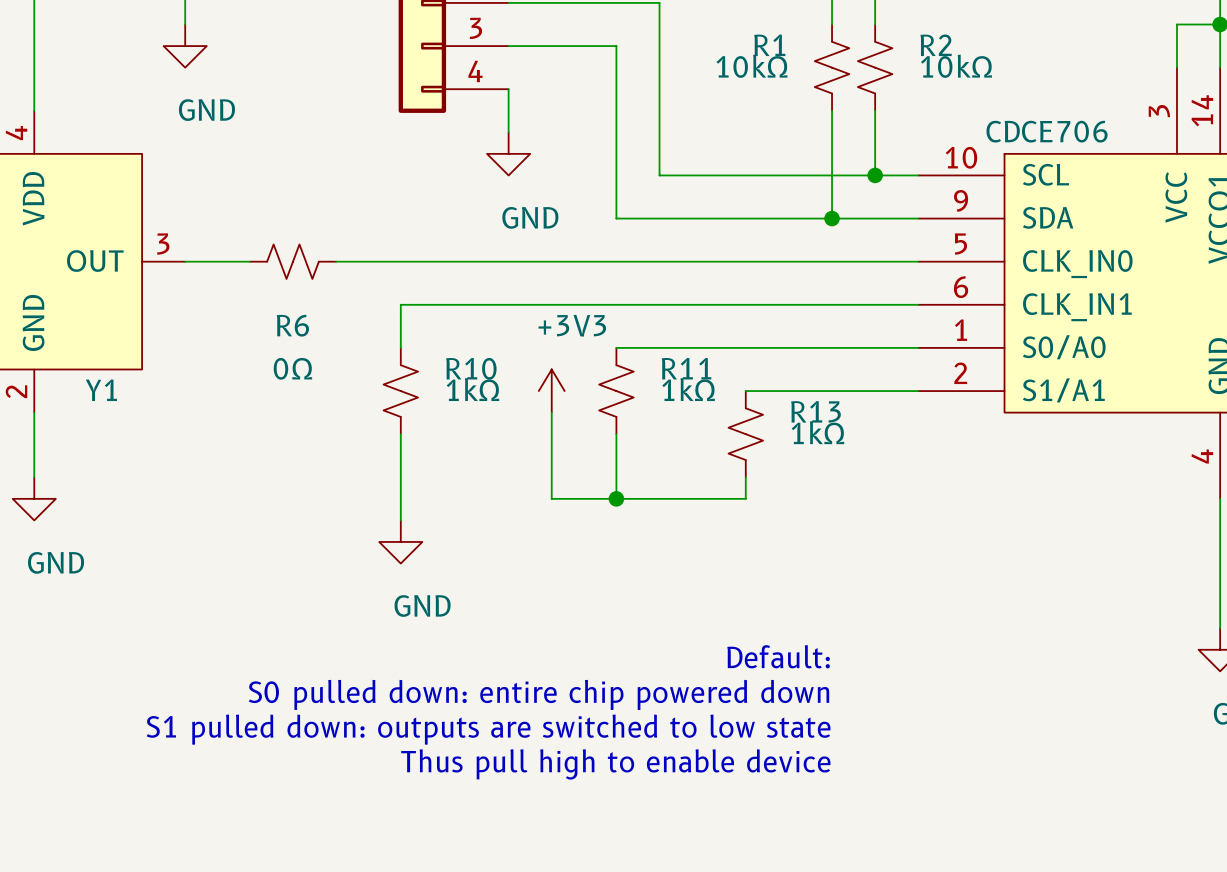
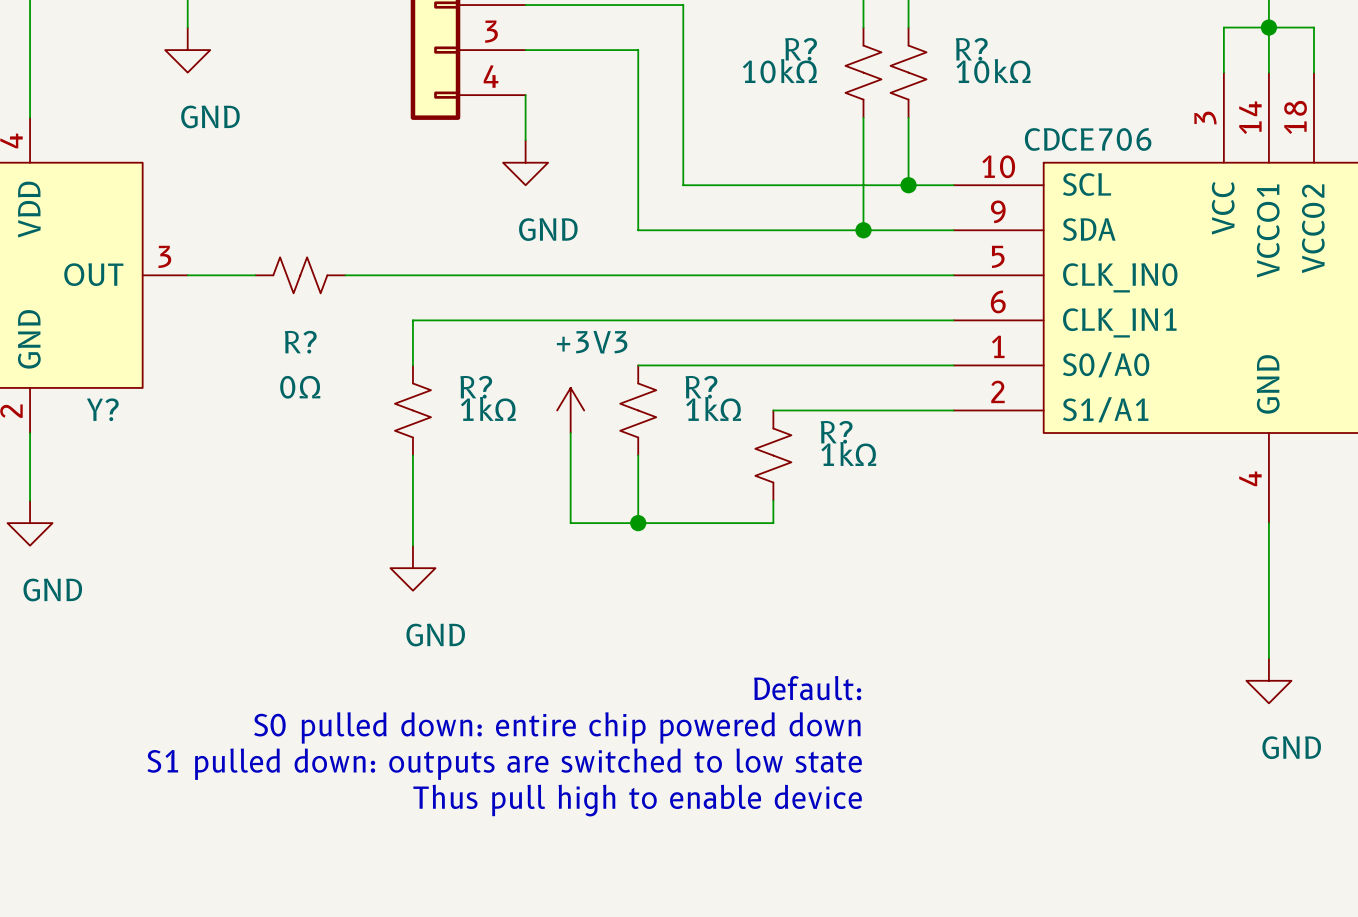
R1 name: R1 (769, 45) -> R? (801, 49)
R2 name: R2 (936, 45) -> R? (971, 49)
R6 name: R6 (292, 325) -> R? (300, 342)
R10 name: R10 (471, 368) -> R? (476, 387)
R11 name: R11 (686, 368) -> R? (701, 387)
Y1 name: Y1 (101, 390) -> Y? (102, 409)
R13 name: R13 (815, 411) -> R? (836, 432)

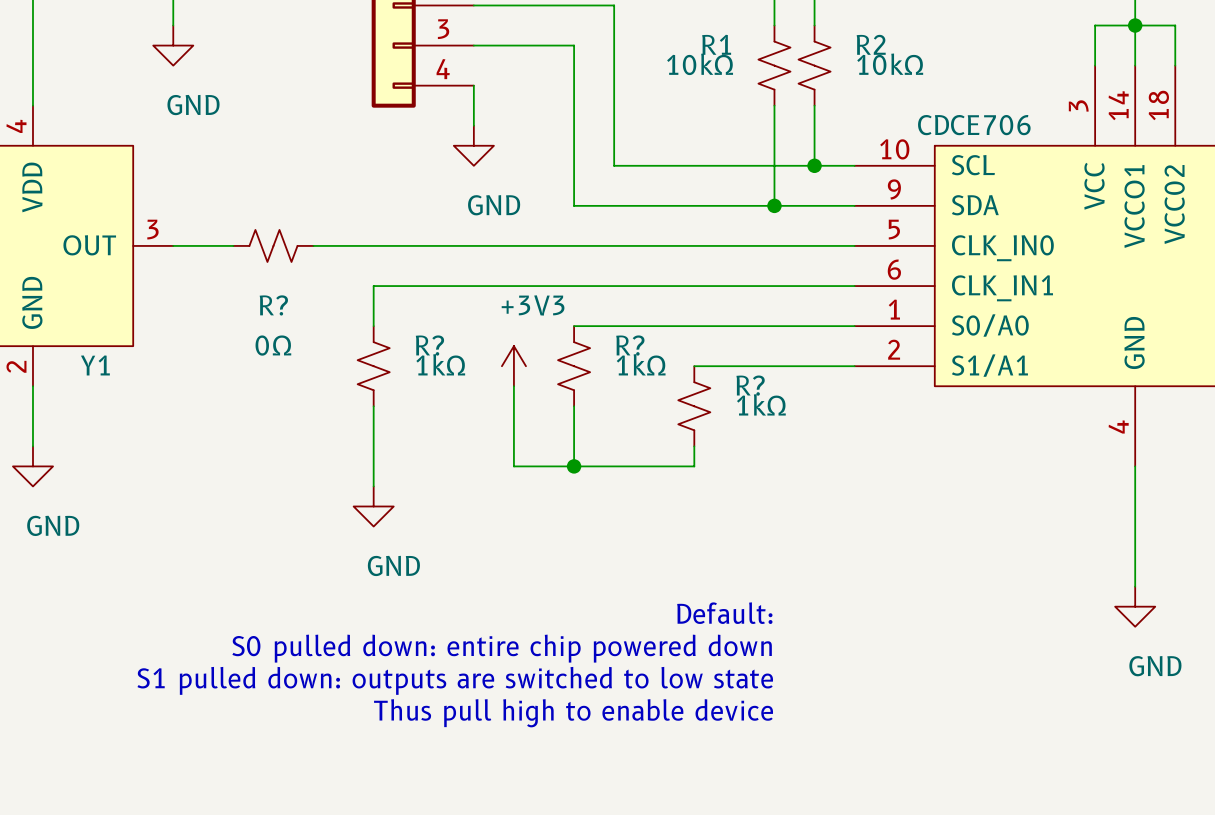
R? name: R? (801, 49) -> R1 (716, 44)
R? name: R? (971, 49) -> R2 (871, 44)
Y? name: Y? (102, 409) -> Y1 (95, 365)

